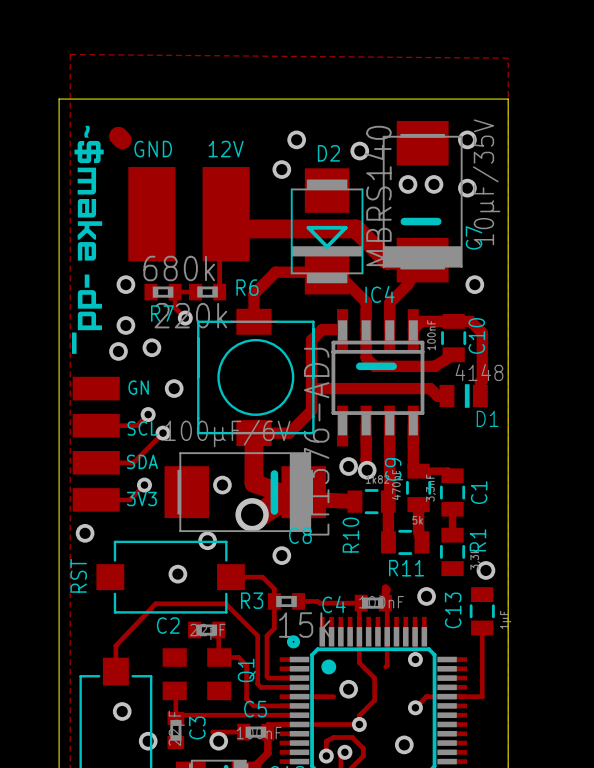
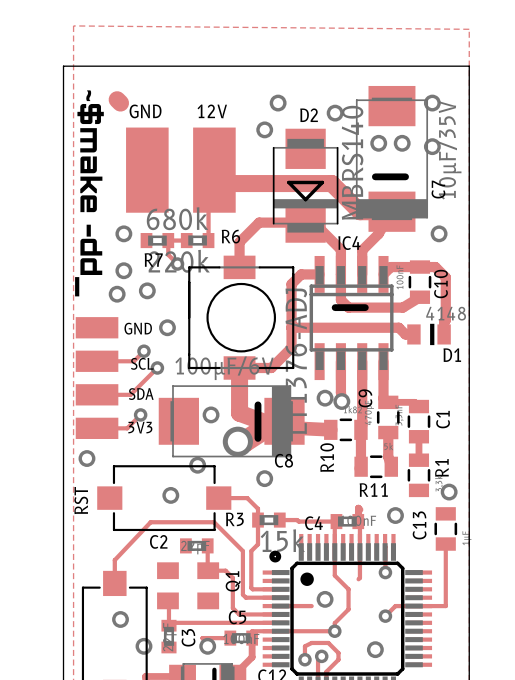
GN name: GN (138, 387) -> none
text: none -> GND (138, 328)

